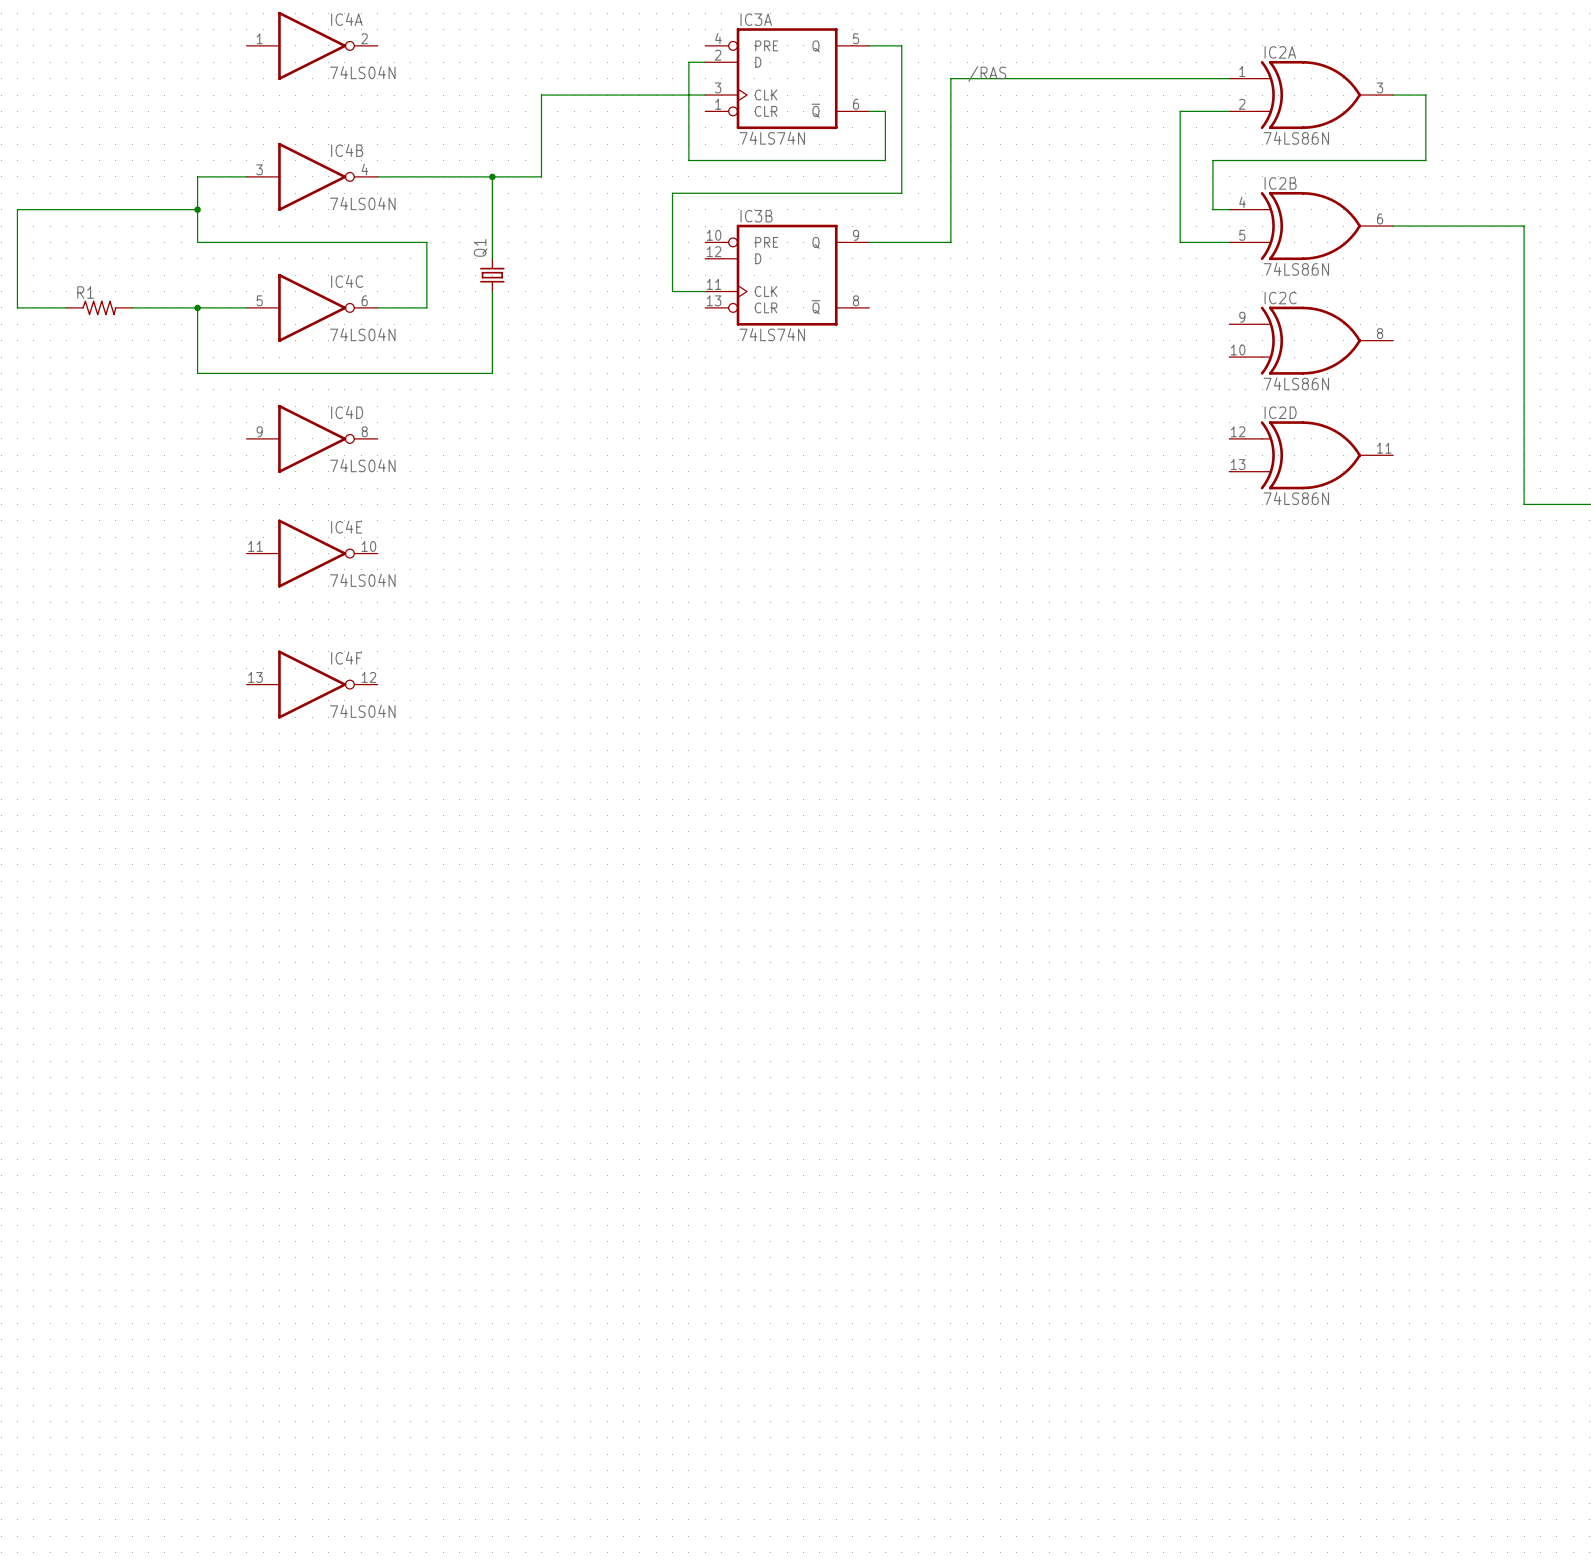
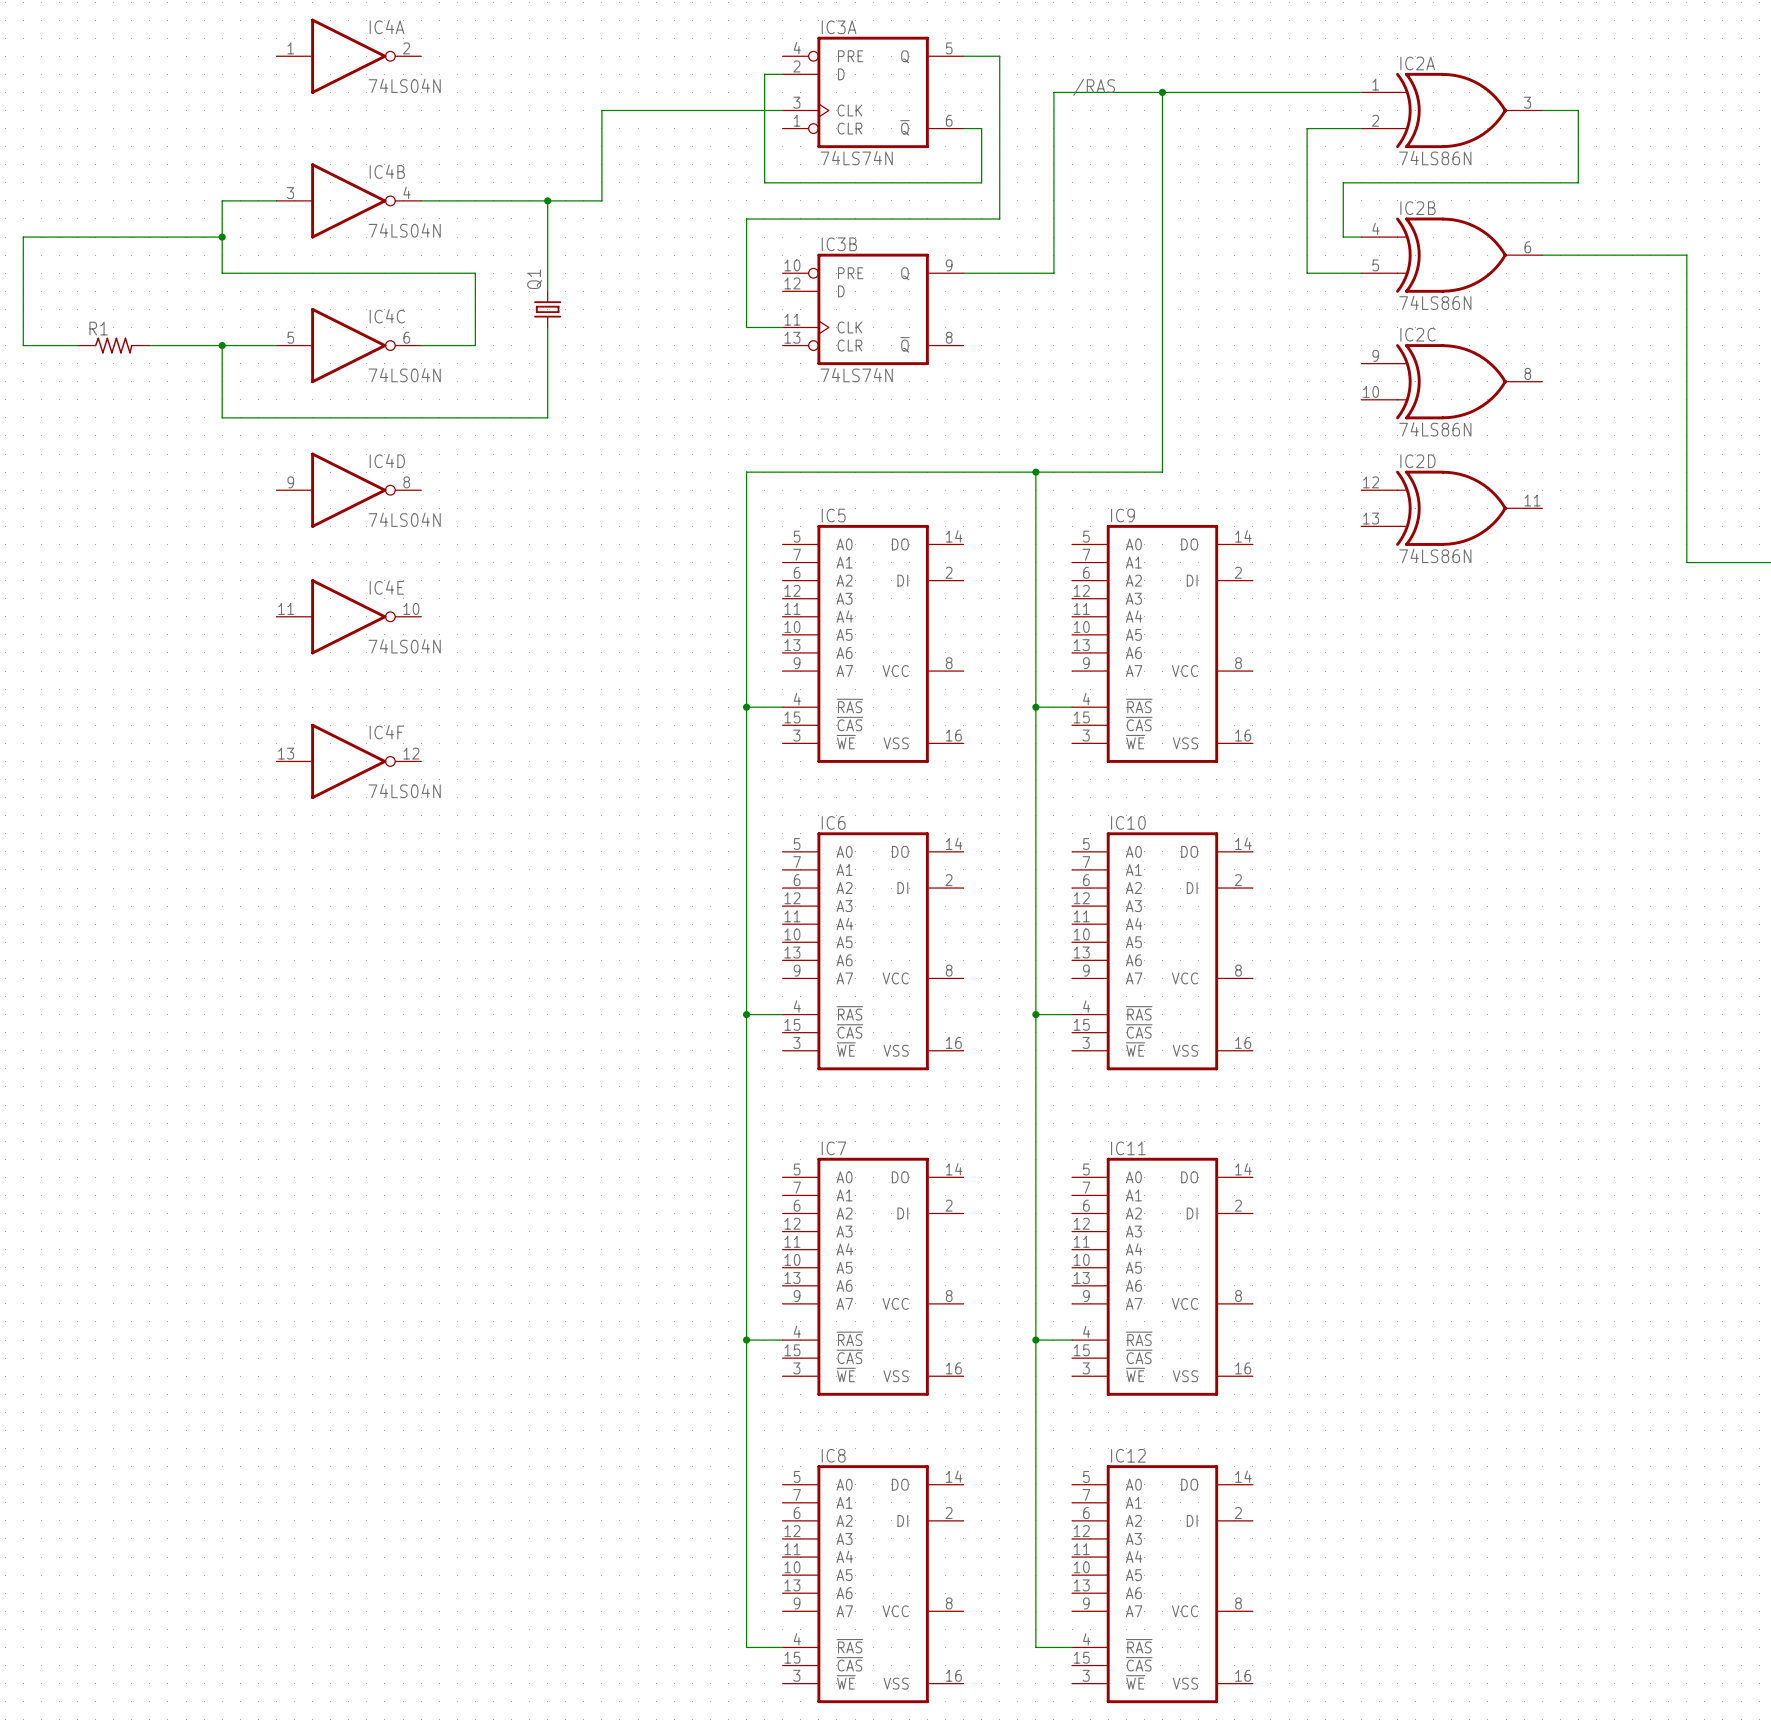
wire: none -> (1162, 92) (1162, 472) (746, 472) (746, 1647) (782, 1647)
junction: none -> (1162, 92)
wire: none -> (1035, 472) (1035, 1647) (1072, 1647)
junction: none -> (1035, 472)
IC5: none -> (873, 643)
IC9: none -> (1162, 643)
wire: none -> (746, 707) (782, 707)
junction: none -> (746, 707)
wire: none -> (1035, 707) (1072, 707)
junction: none -> (1035, 707)
IC6: none -> (873, 951)
IC10: none -> (1162, 951)
wire: none -> (746, 1014) (782, 1014)
junction: none -> (746, 1014)
wire: none -> (1035, 1014) (1072, 1014)
junction: none -> (1035, 1014)
IC7: none -> (873, 1276)
IC11: none -> (1162, 1276)
wire: none -> (746, 1340) (782, 1340)
junction: none -> (746, 1340)
wire: none -> (1035, 1340) (1072, 1340)
junction: none -> (1035, 1340)
IC8: none -> (873, 1584)
IC12: none -> (1162, 1584)

